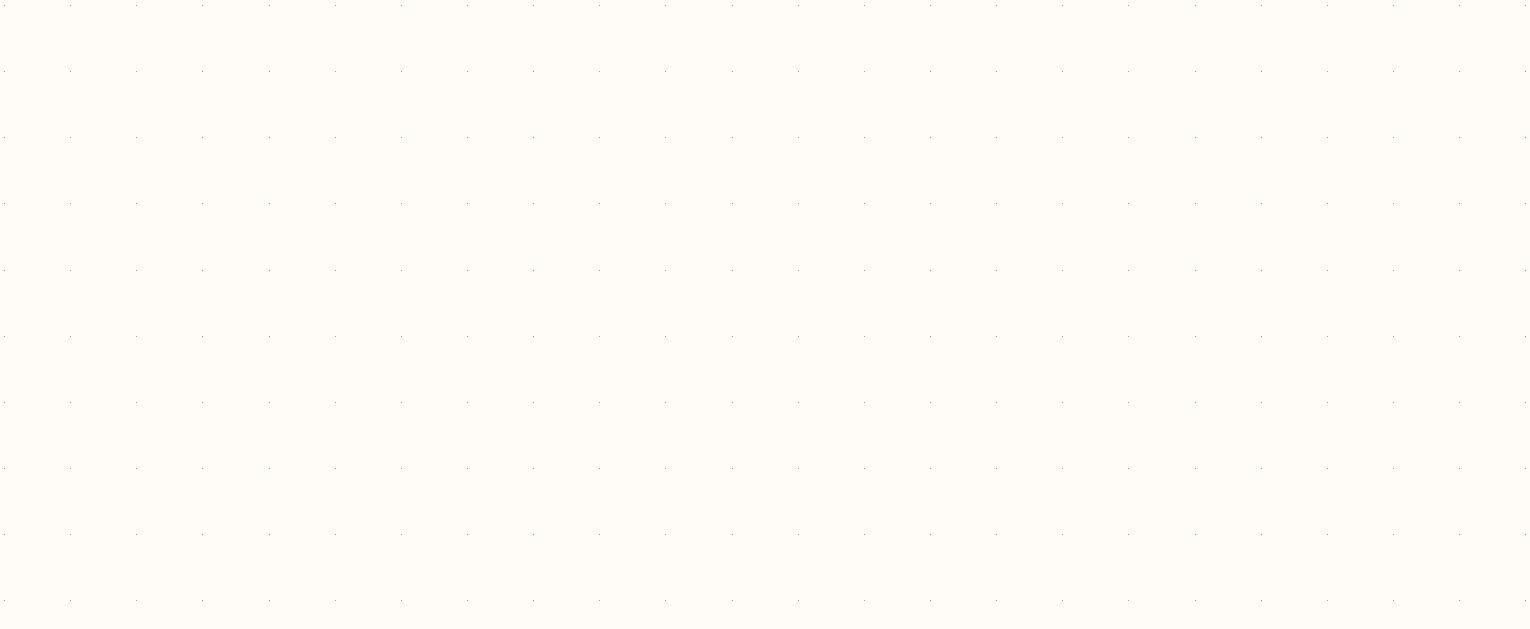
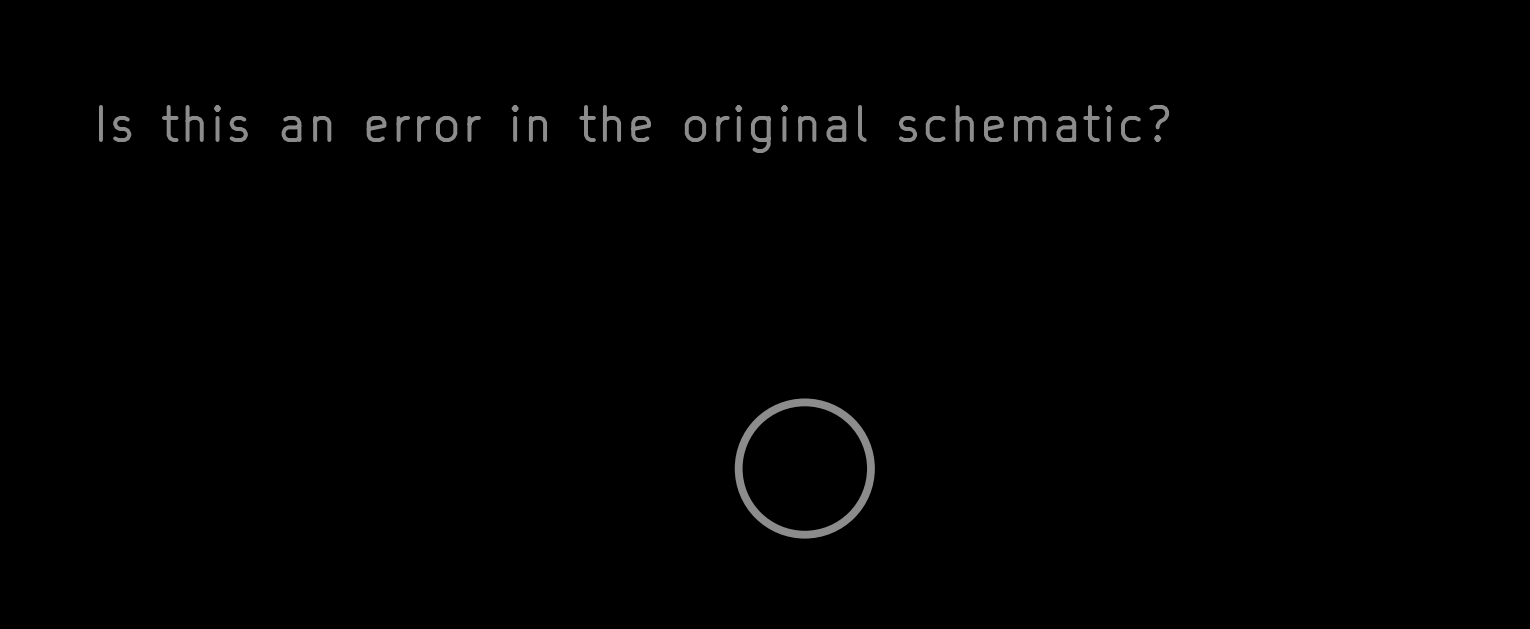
text: none -> Is this an error in the original schematic? (634, 128)
drawing: none -> [734, 398, 875, 539]

